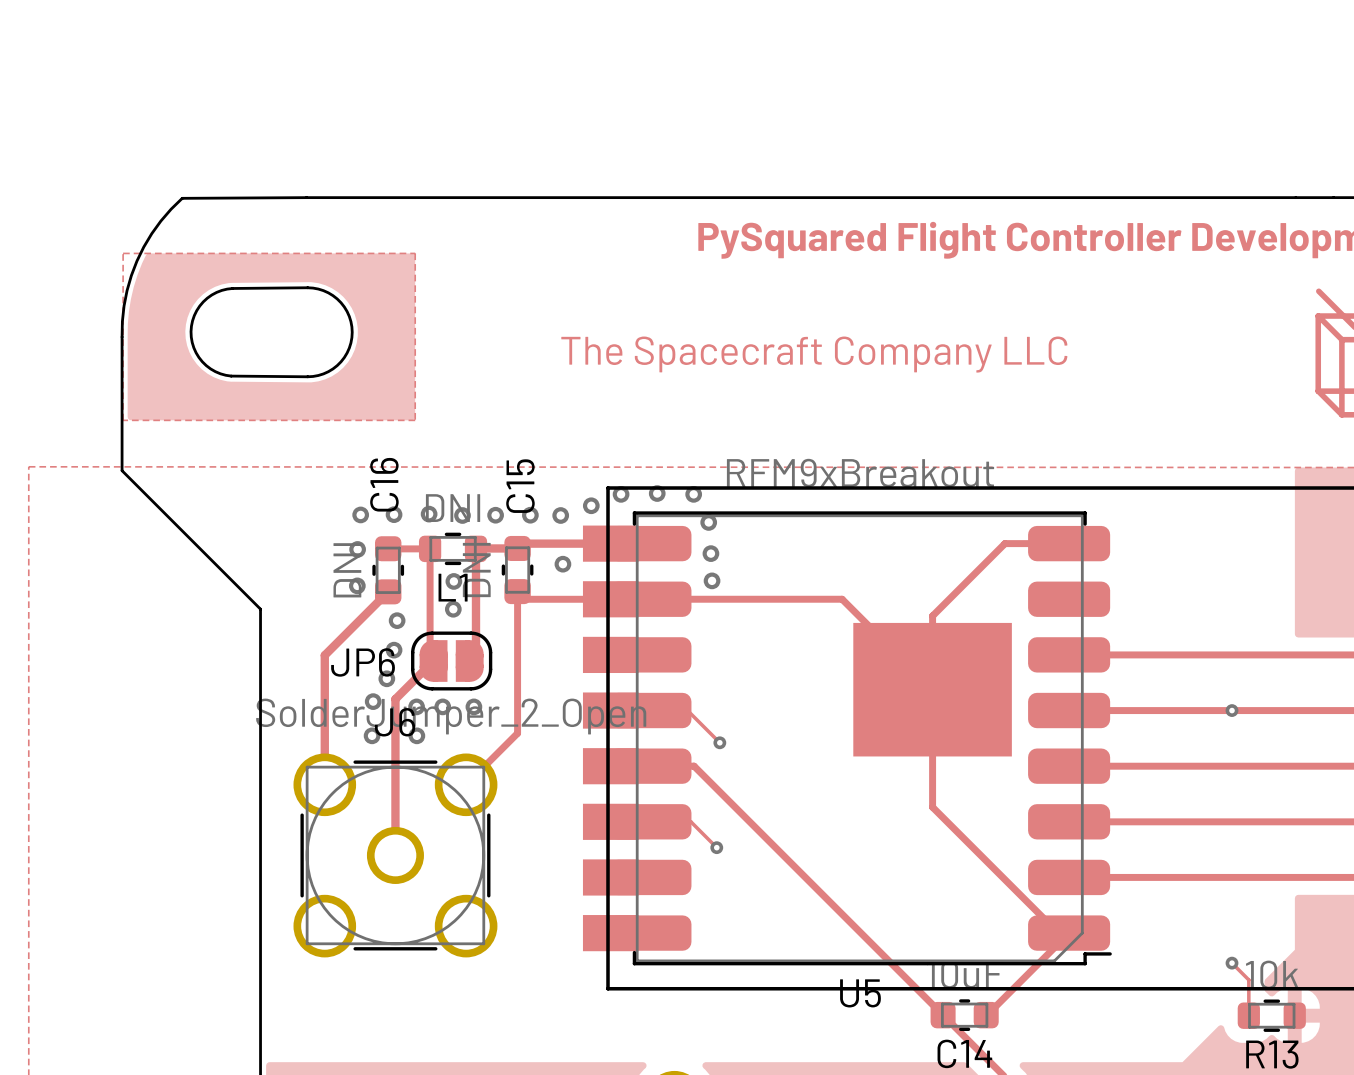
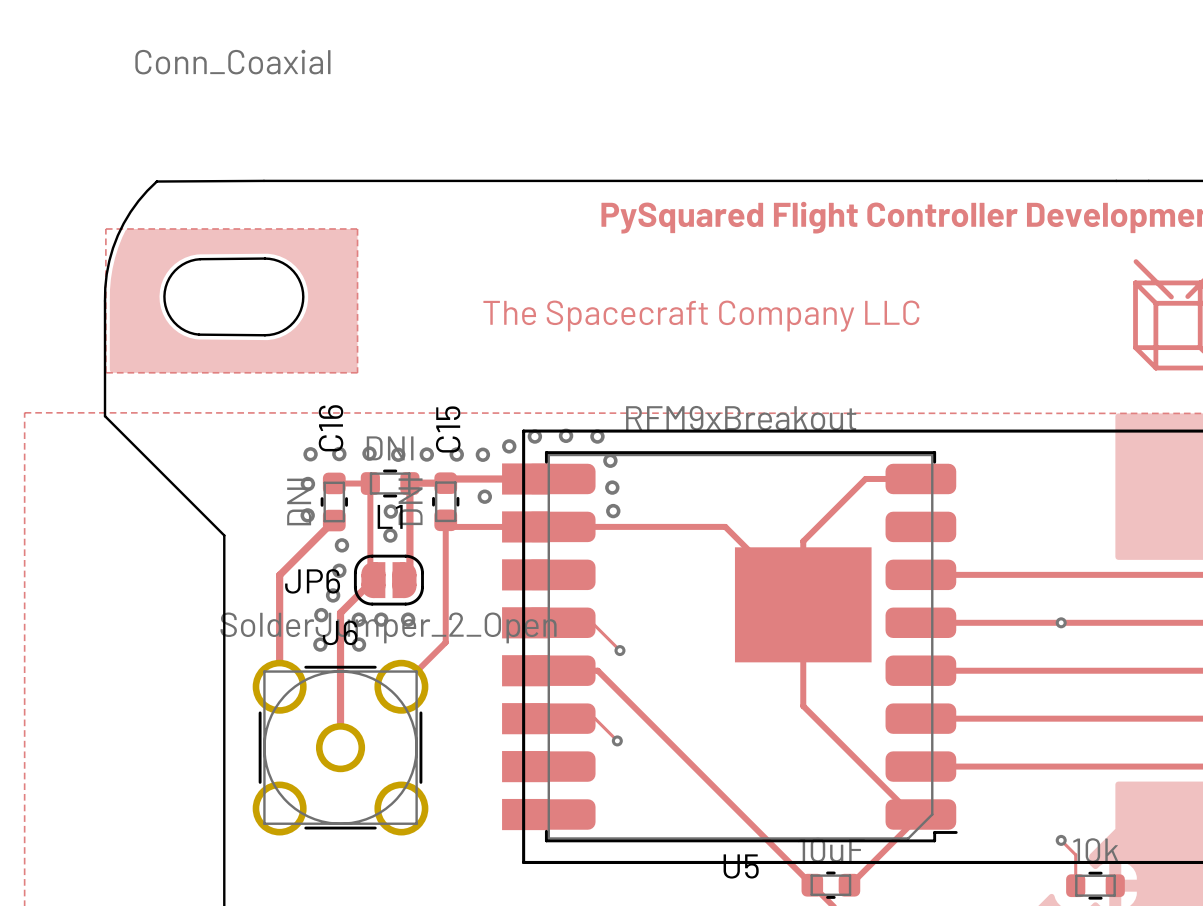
J6 value: none -> Conn_Coaxial (232, 62)

